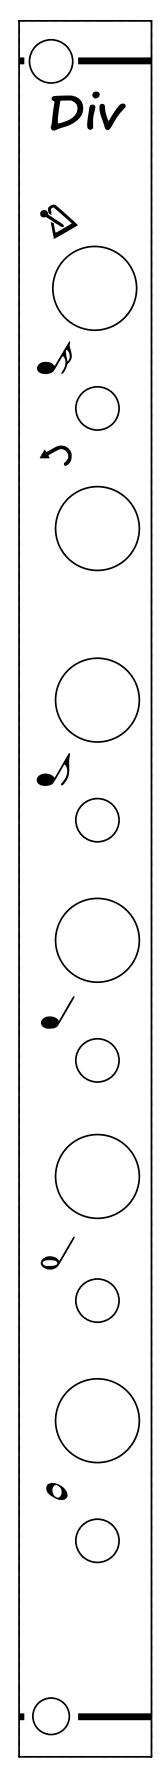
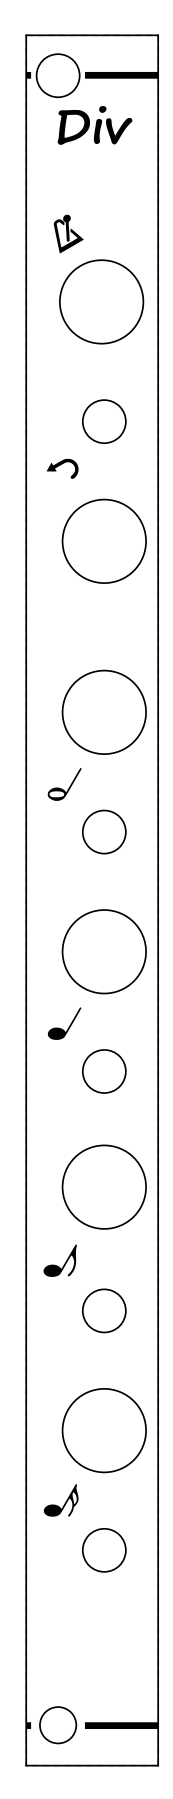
drawing shape: [19, 57, 152, 1721] -> [26, 71, 159, 1730]

